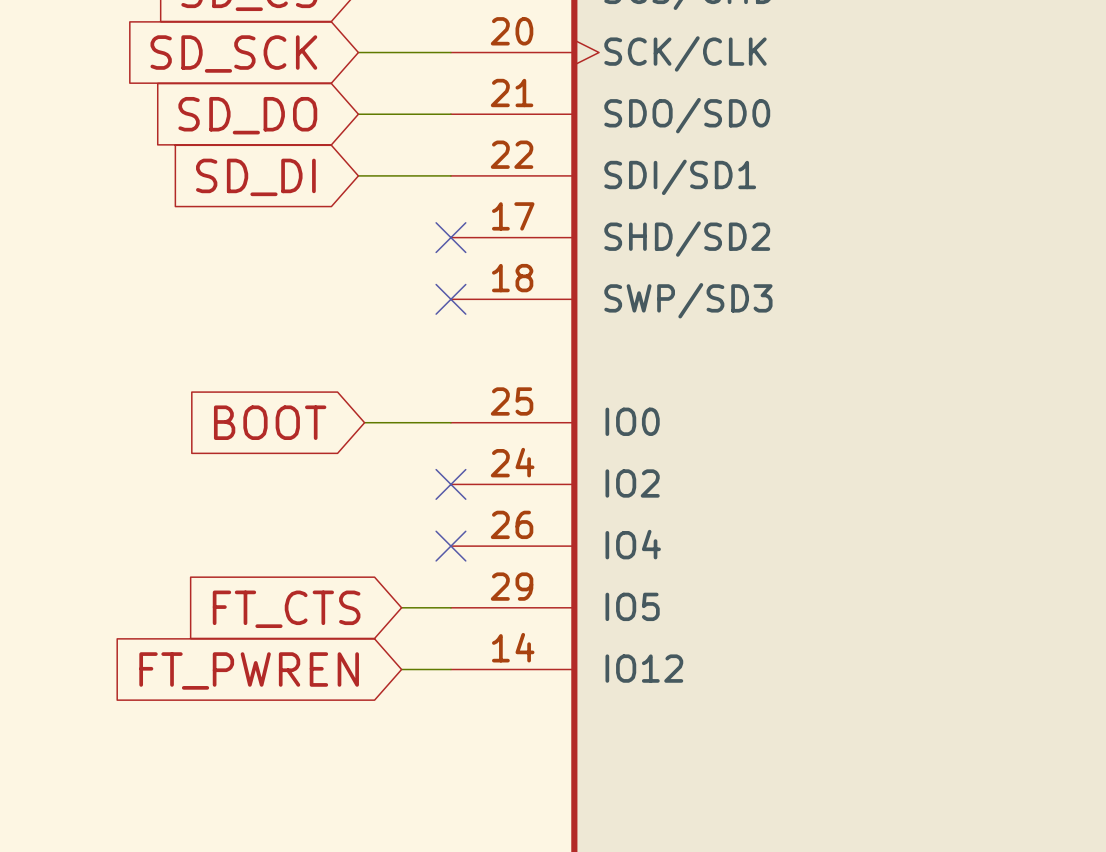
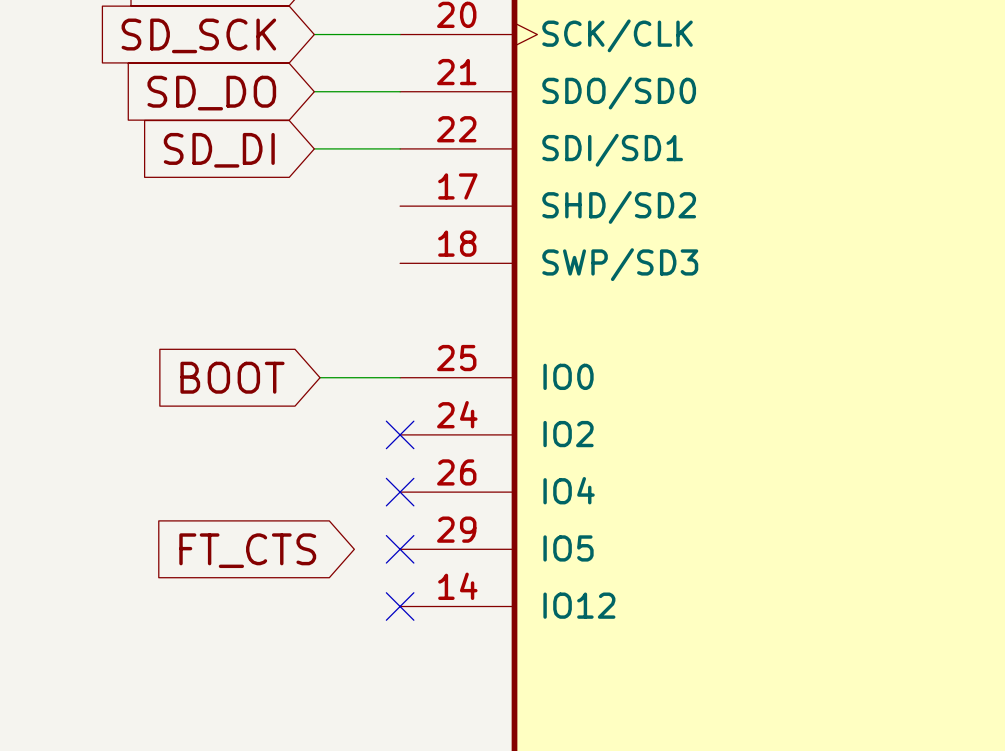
no-connect mark: (450, 237) -> none
no-connect mark: (450, 299) -> none
wire: (401, 607) (450, 607) -> none
no-connect mark: none -> (400, 549)
wire: (401, 669) (450, 669) -> none
no-connect mark: none -> (400, 606)
global label: FT_PWREN (249, 670) -> none

